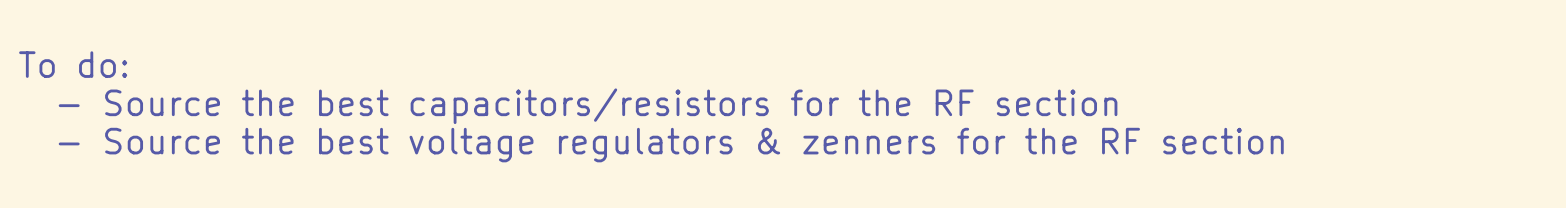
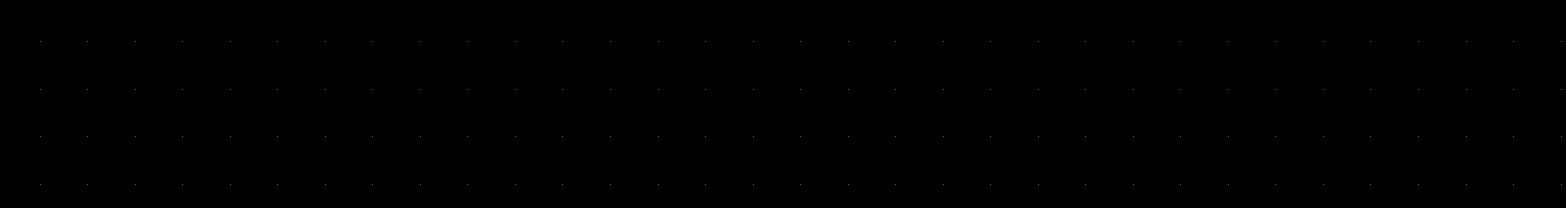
text: To do: (73, 64) -> none
text: - Source the best capacitors/resistors for the RF section (588, 106) -> none
text: - Source the best voltage regulators & zenners for the RF section (671, 145) -> none

